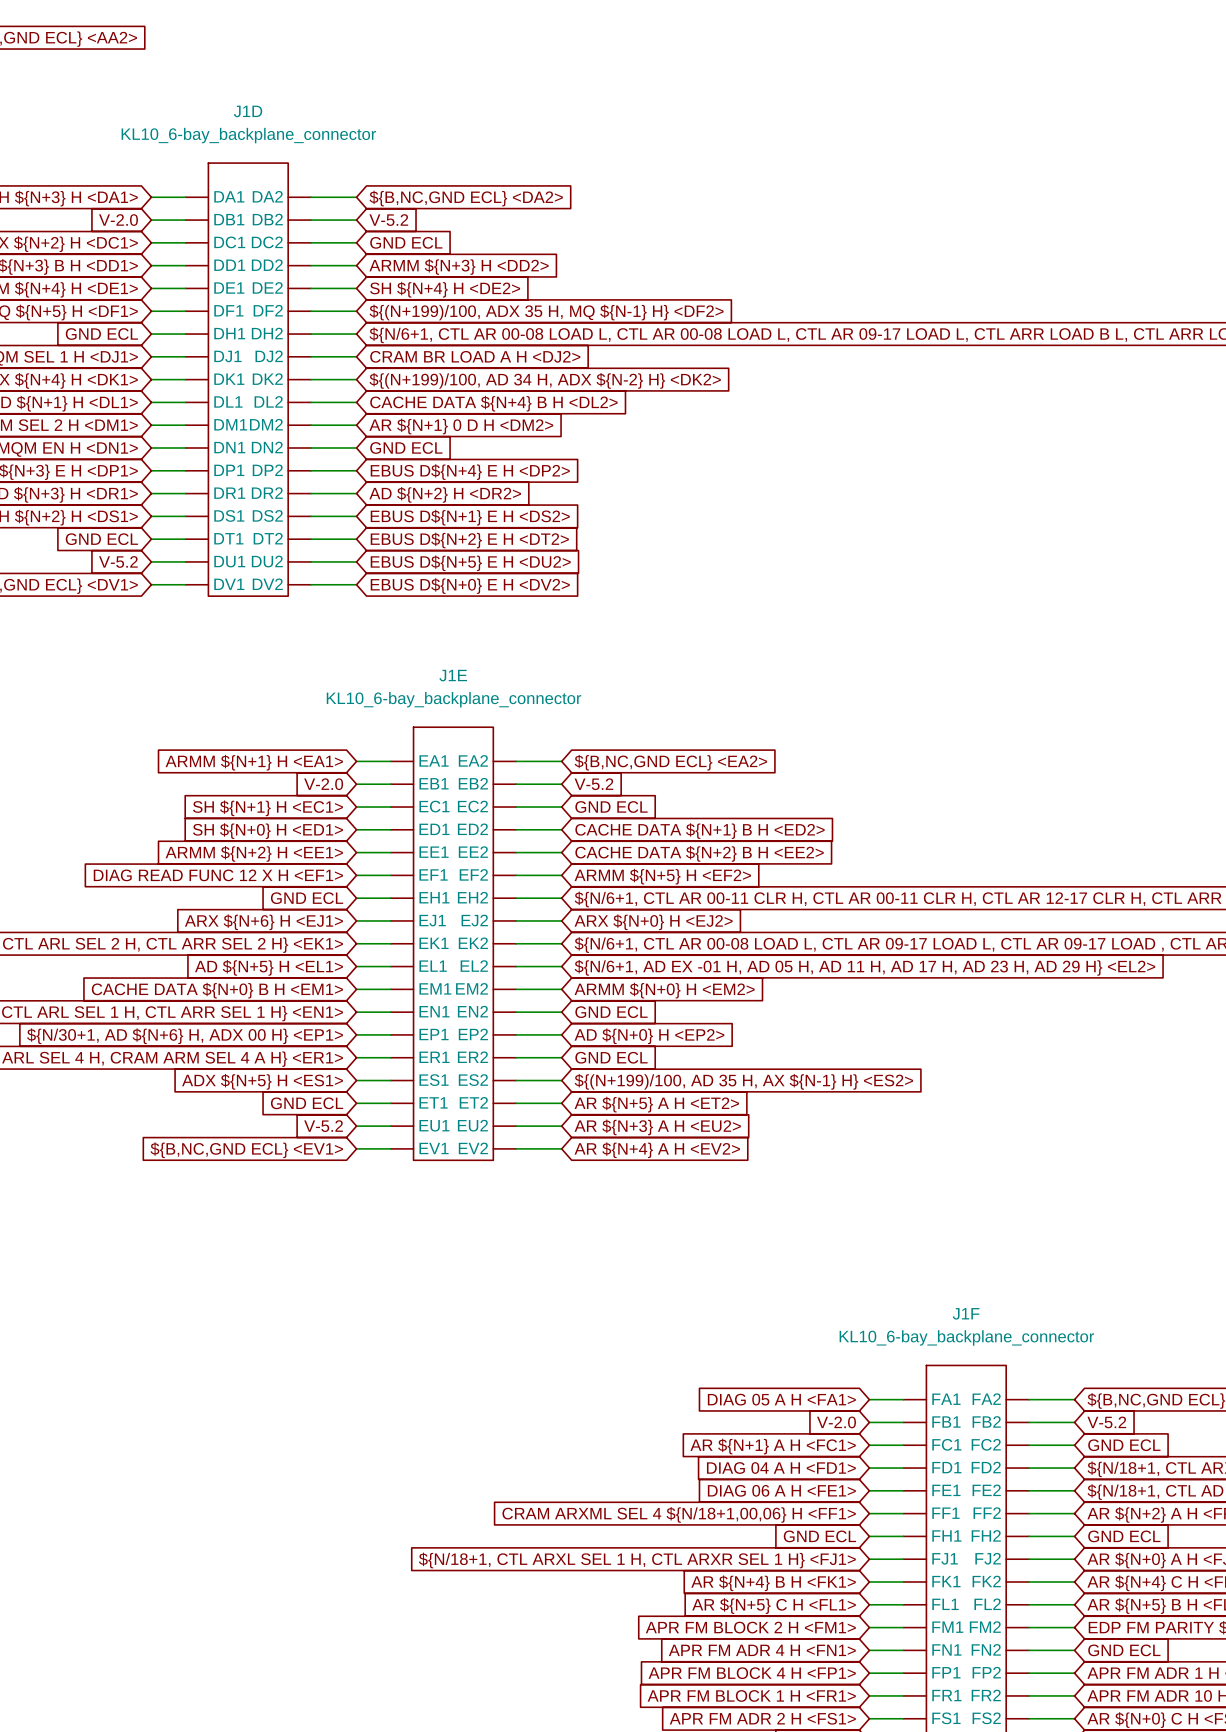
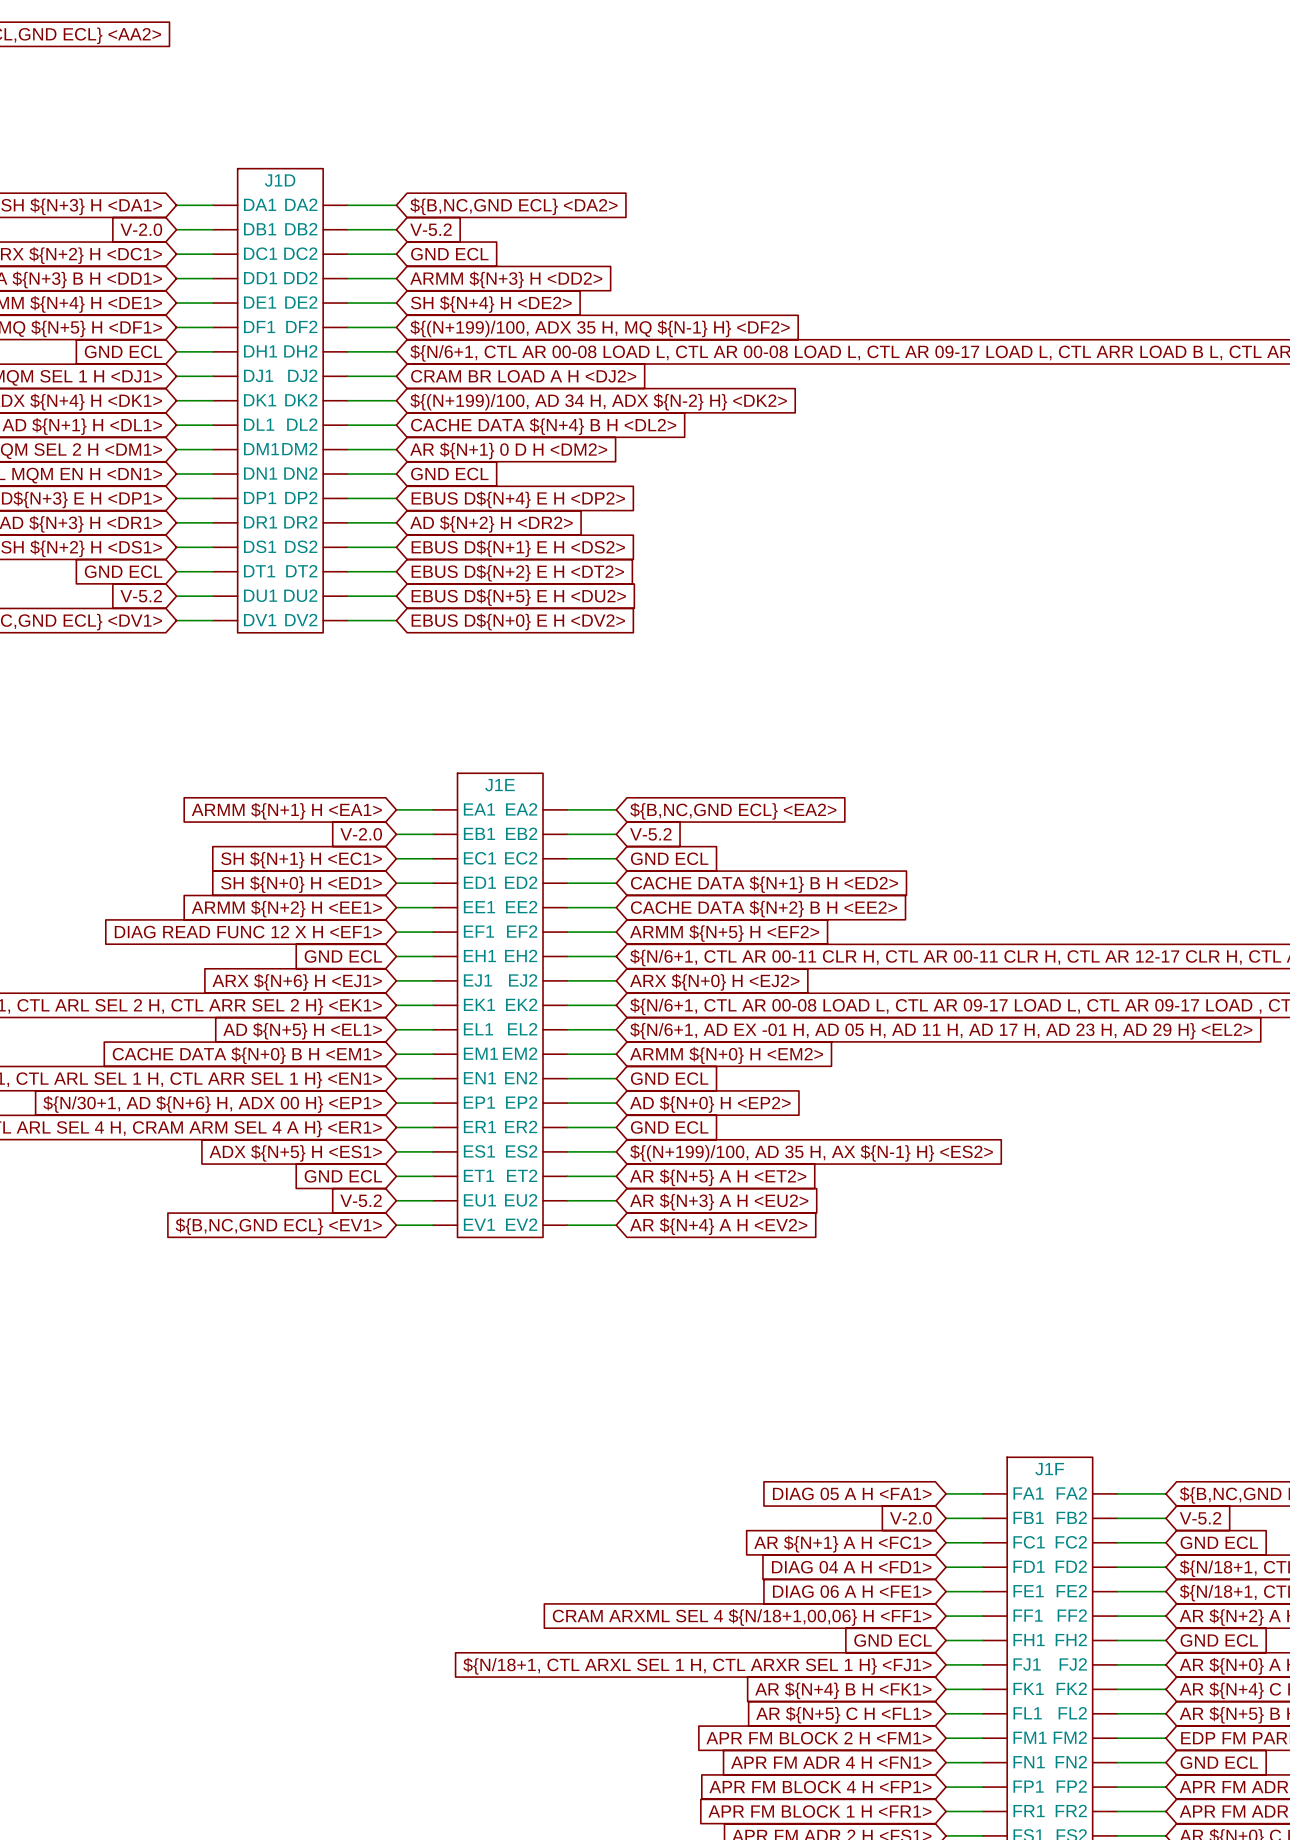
J1D name position: J1D (248, 111) -> J1D (280, 180)
J1D value: KL10_6-bay_backplane_connector (248, 135) -> none
J1E name position: J1E (453, 675) -> J1E (500, 785)
J1E value: KL10_6-bay_backplane_connector (453, 699) -> none
J1F name position: J1F (966, 1313) -> J1F (1049, 1469)
J1F value: KL10_6-bay_backplane_connector (966, 1337) -> none

